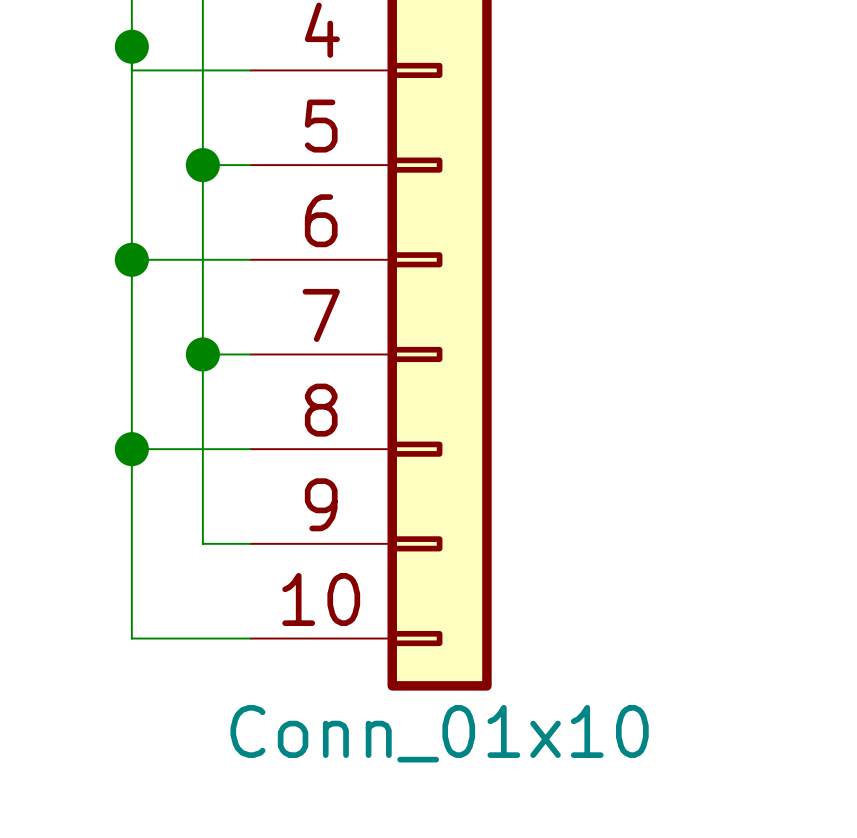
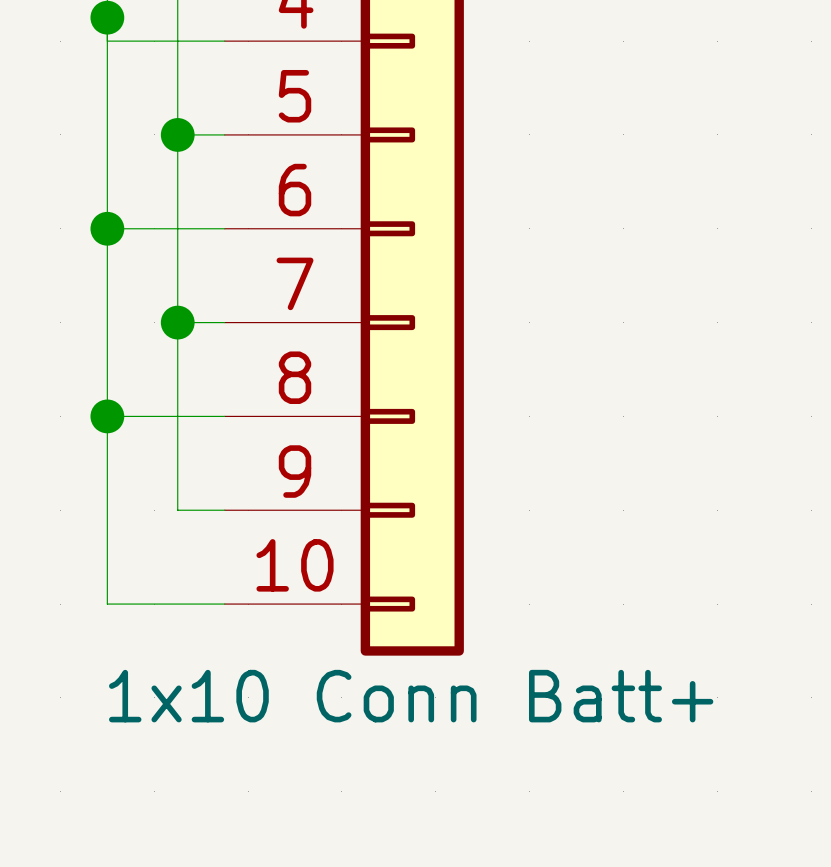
part value: Conn_01x10 (439, 733) -> 1x10 Conn Batt+ (411, 696)

